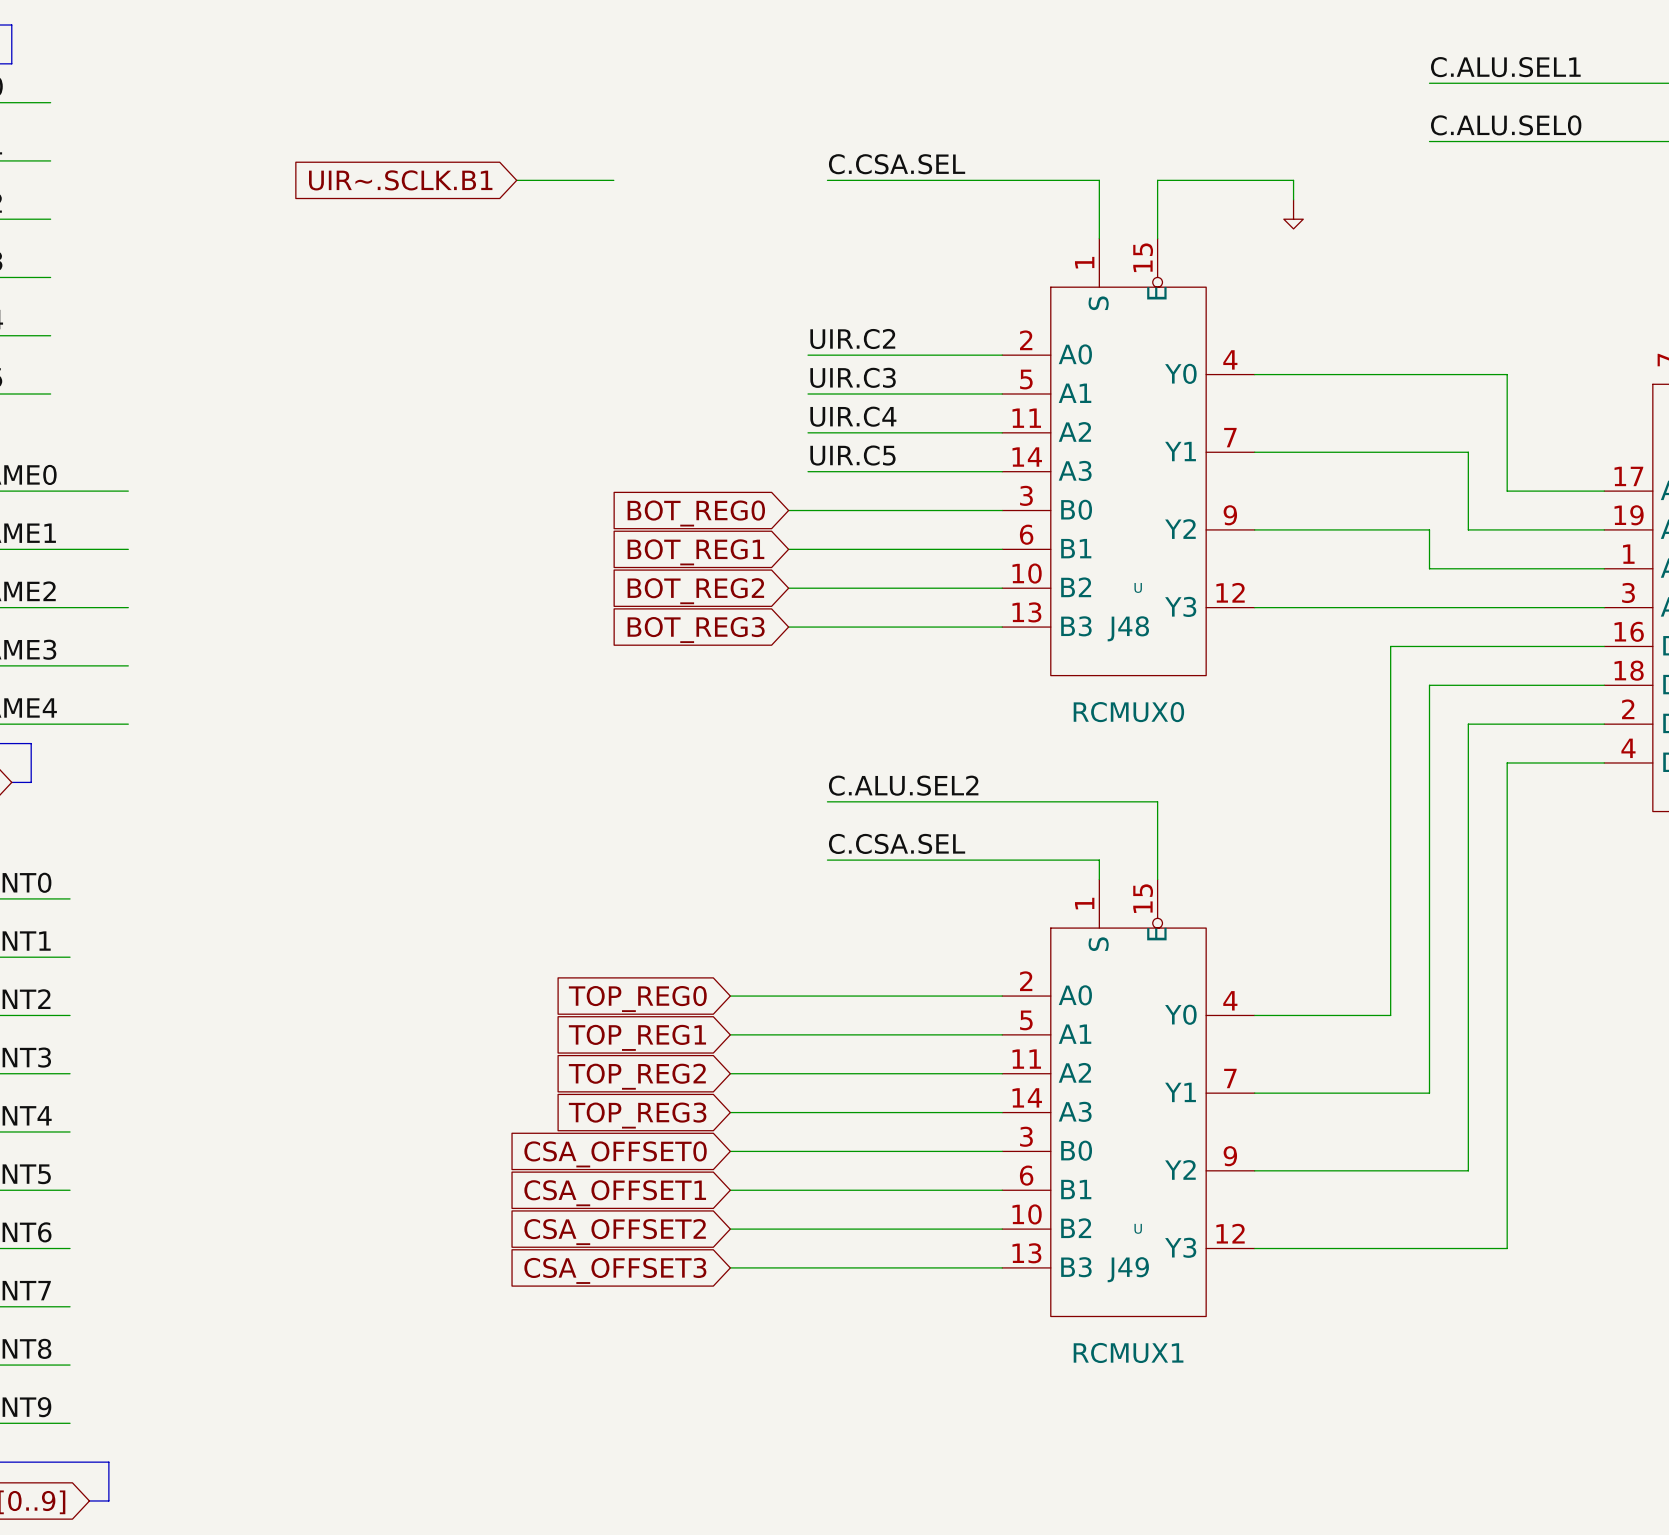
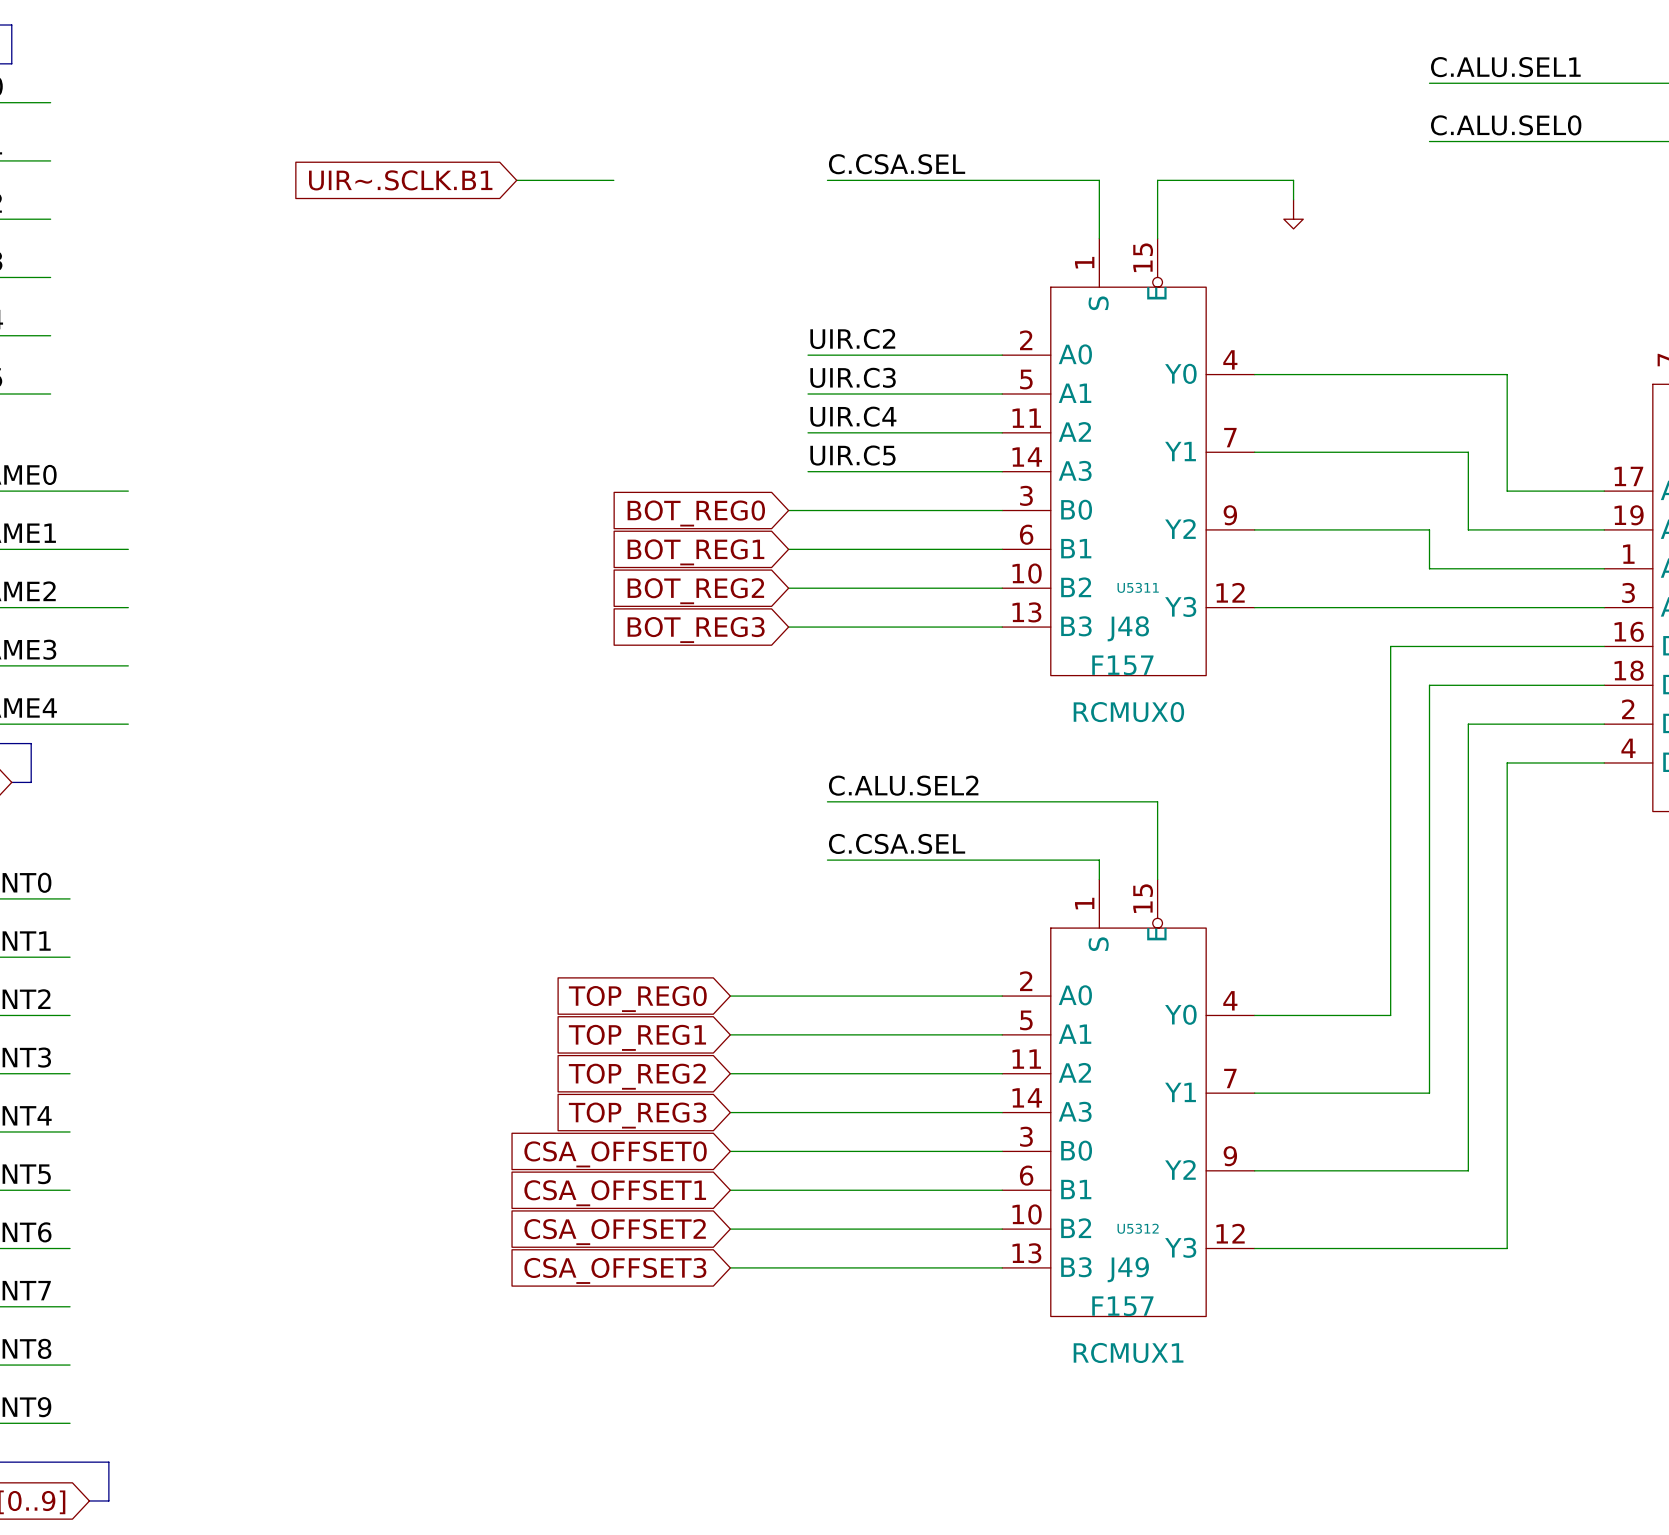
U name: U (1138, 587) -> U5311 (1138, 587)
U value: none -> F157 (1122, 665)
U name: U (1138, 1228) -> U5312 (1138, 1228)
U value: none -> F157 (1122, 1306)

